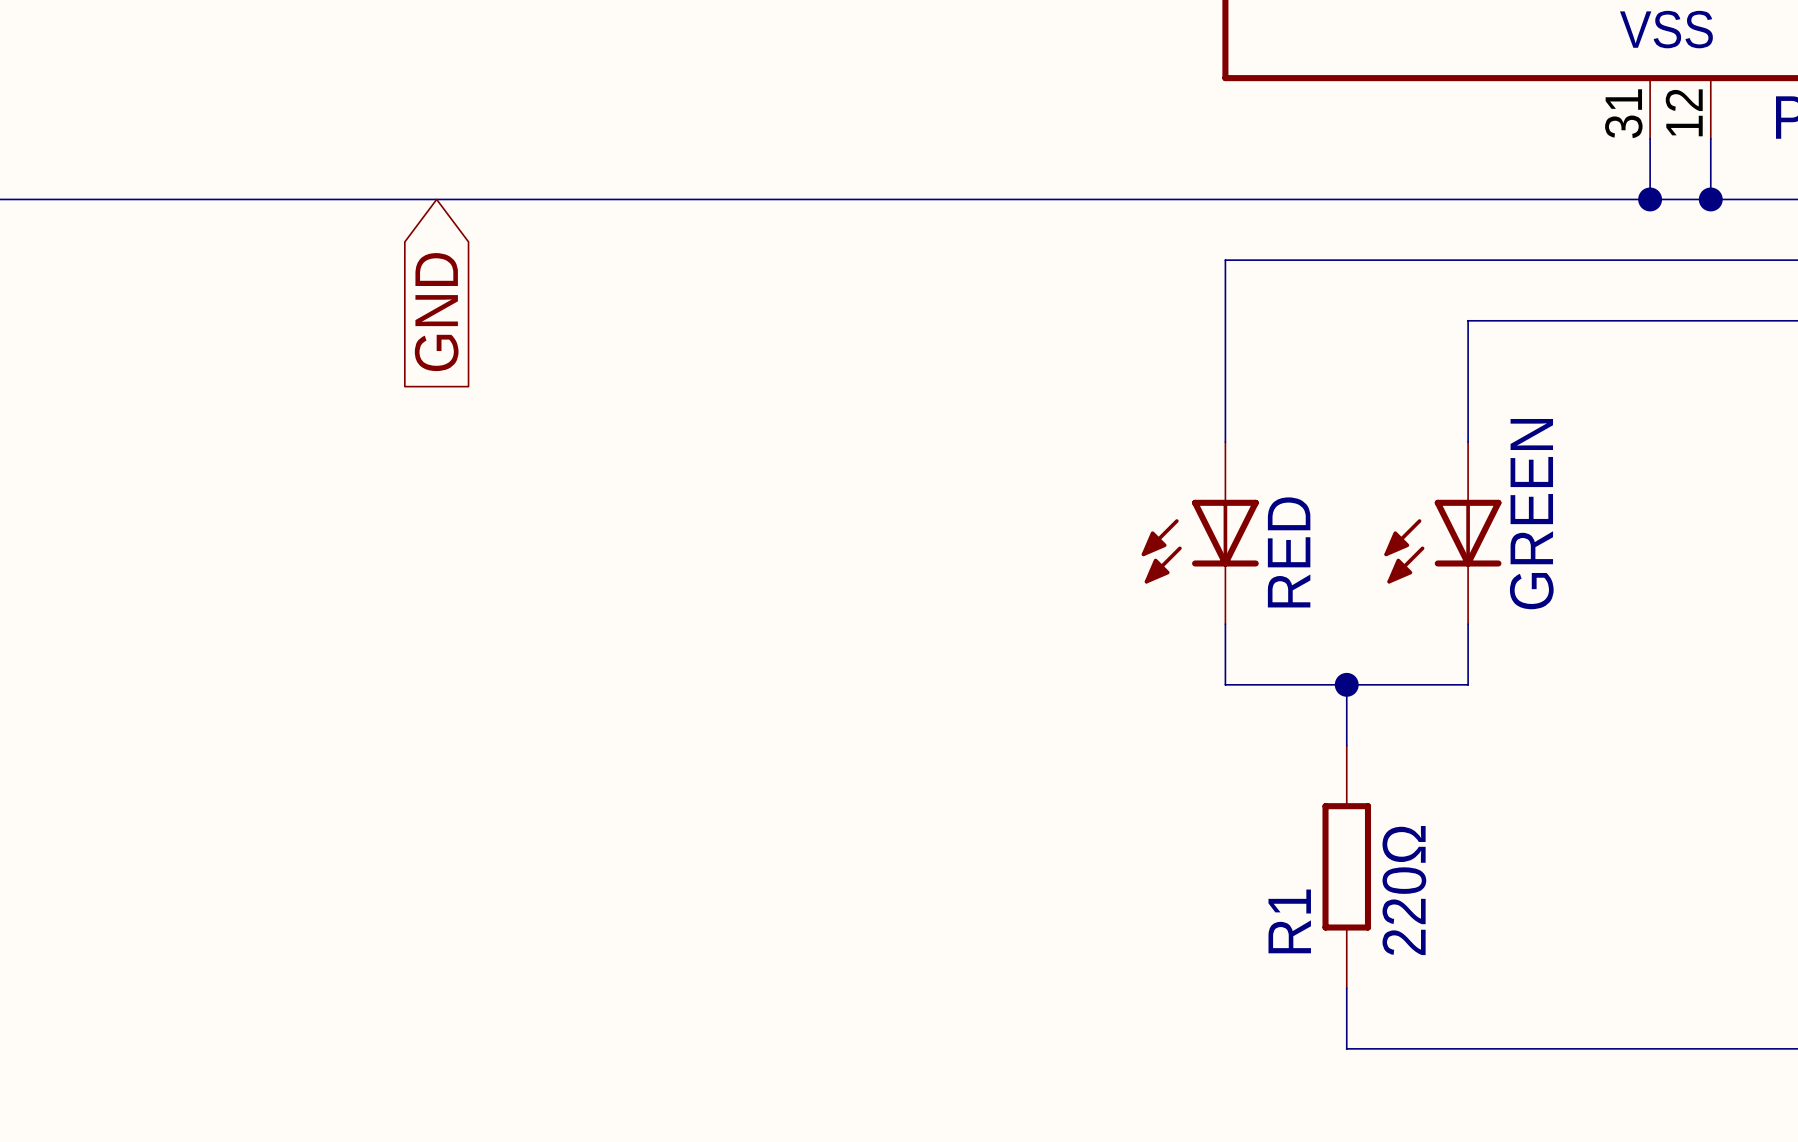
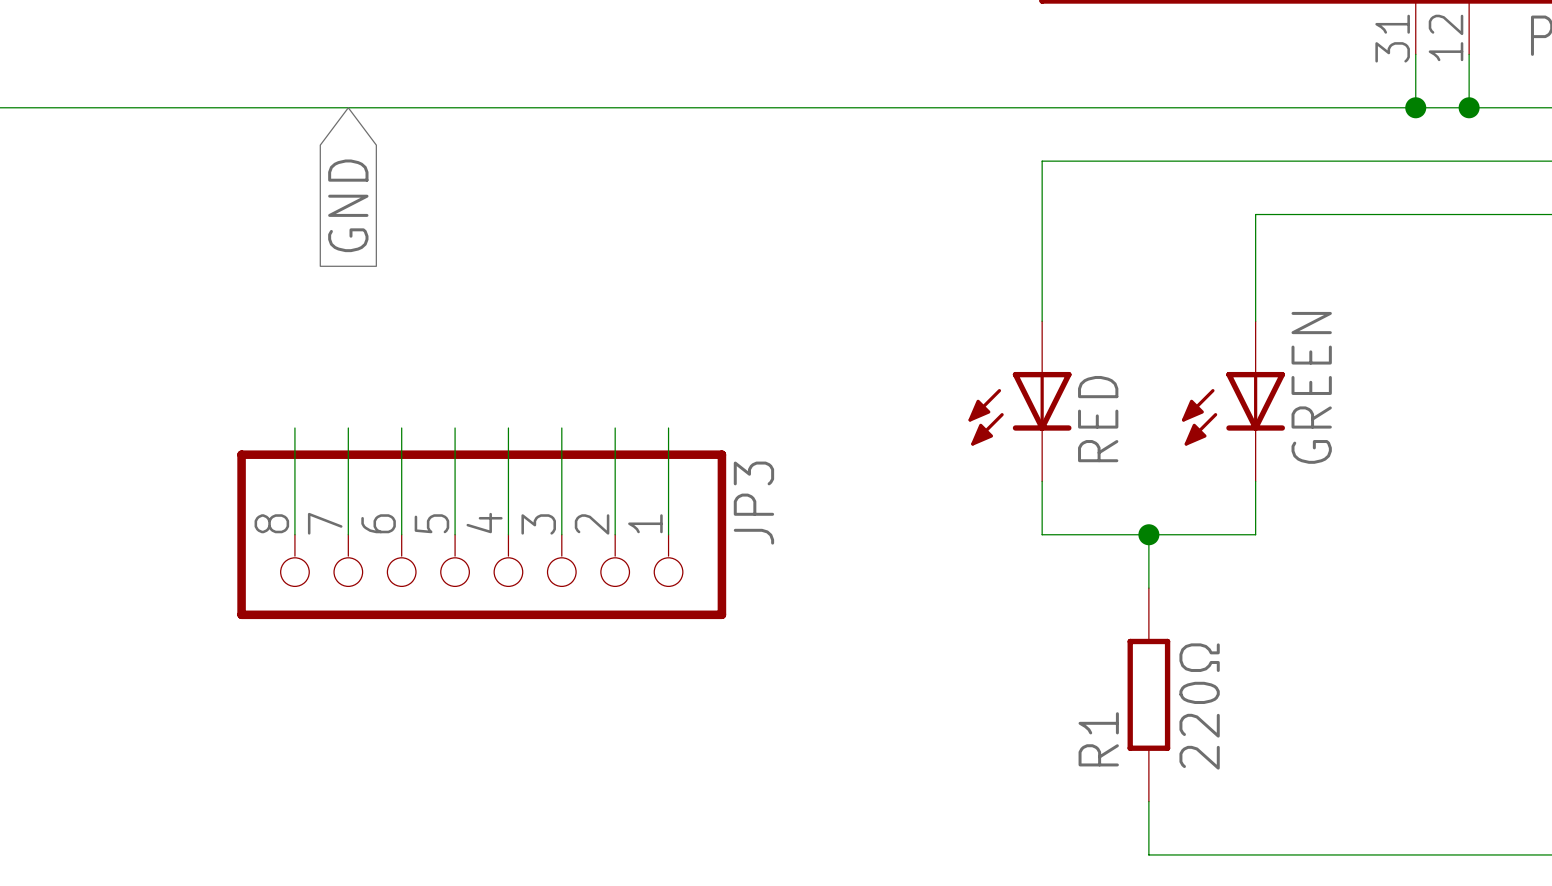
wire: none -> (294, 428) (294, 534)
wire: none -> (348, 428) (348, 534)
wire: none -> (401, 428) (401, 534)
wire: none -> (455, 428) (455, 534)
wire: none -> (508, 428) (508, 534)
wire: none -> (561, 428) (561, 534)
wire: none -> (615, 428) (615, 534)
wire: none -> (668, 428) (668, 534)
JP3: none -> (481, 534)

